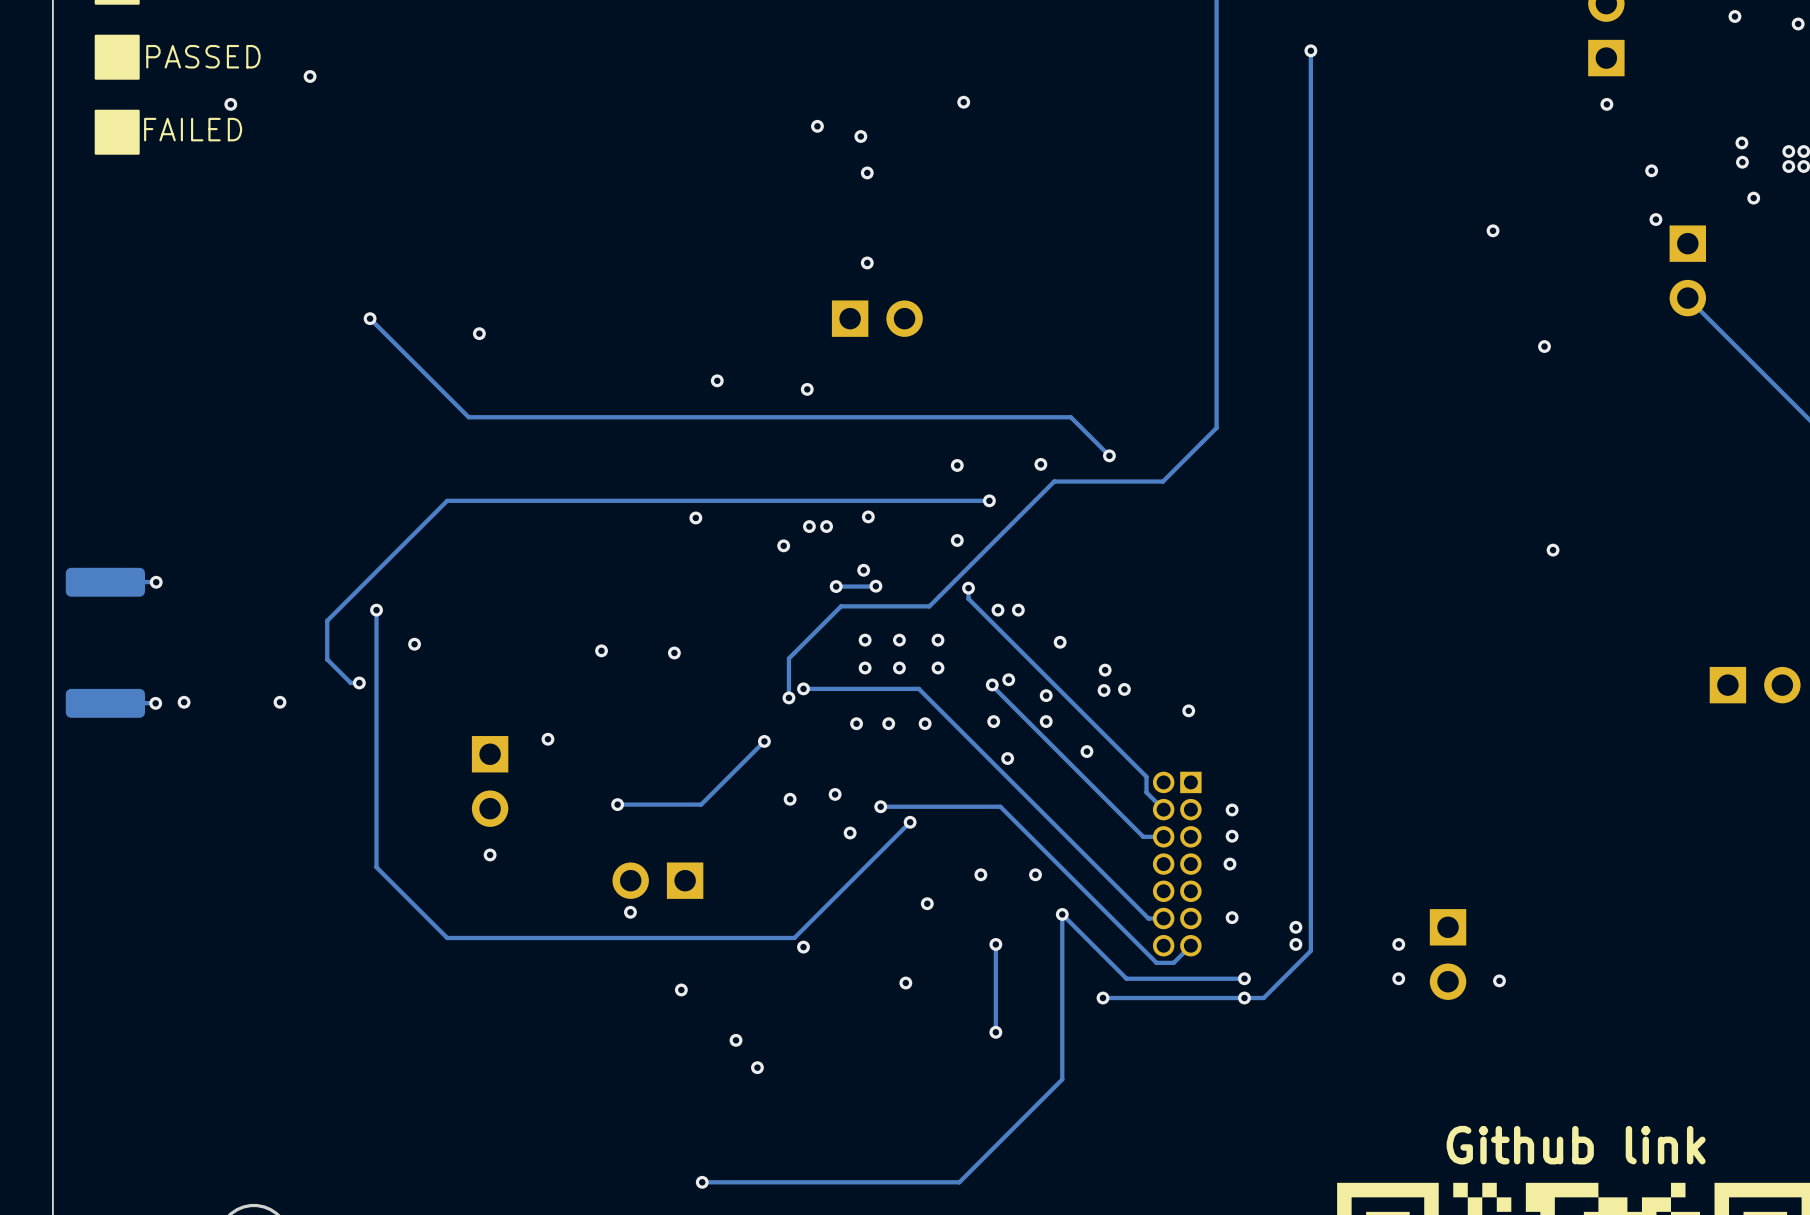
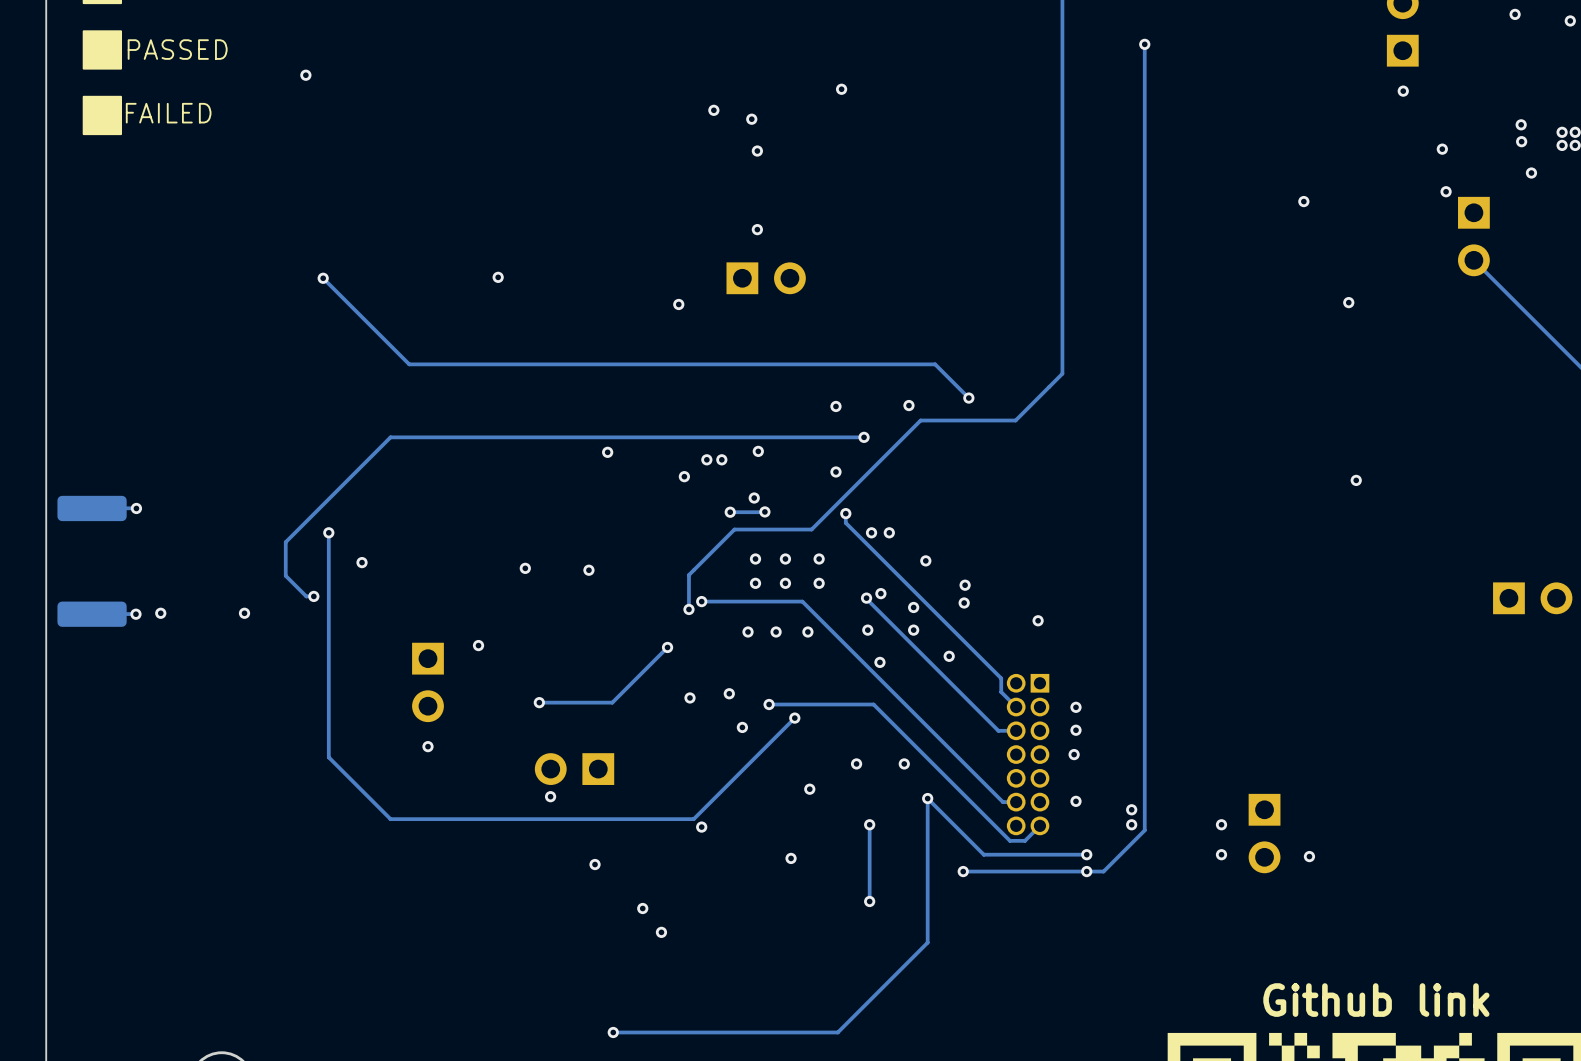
via position: (310, 76) -> (305, 75)
via: (230, 104) -> none
via: none -> (498, 277)
via: (479, 333) -> none
via: none -> (678, 304)
via: (717, 380) -> none
via: (807, 389) -> none
via: (1124, 689) -> none

